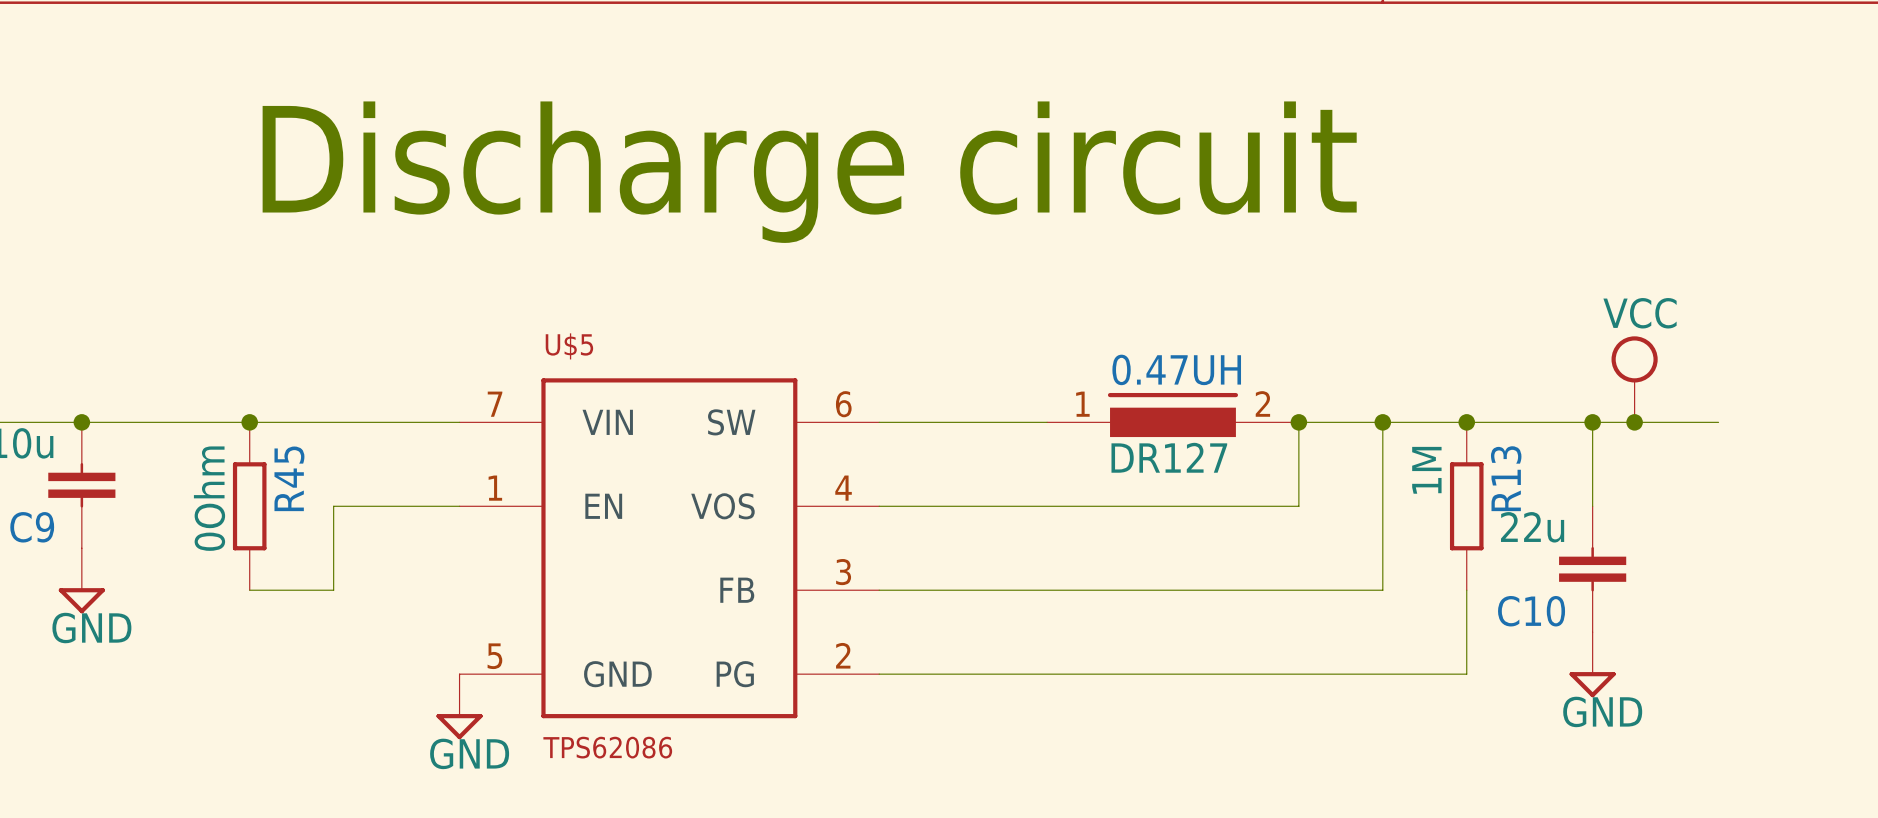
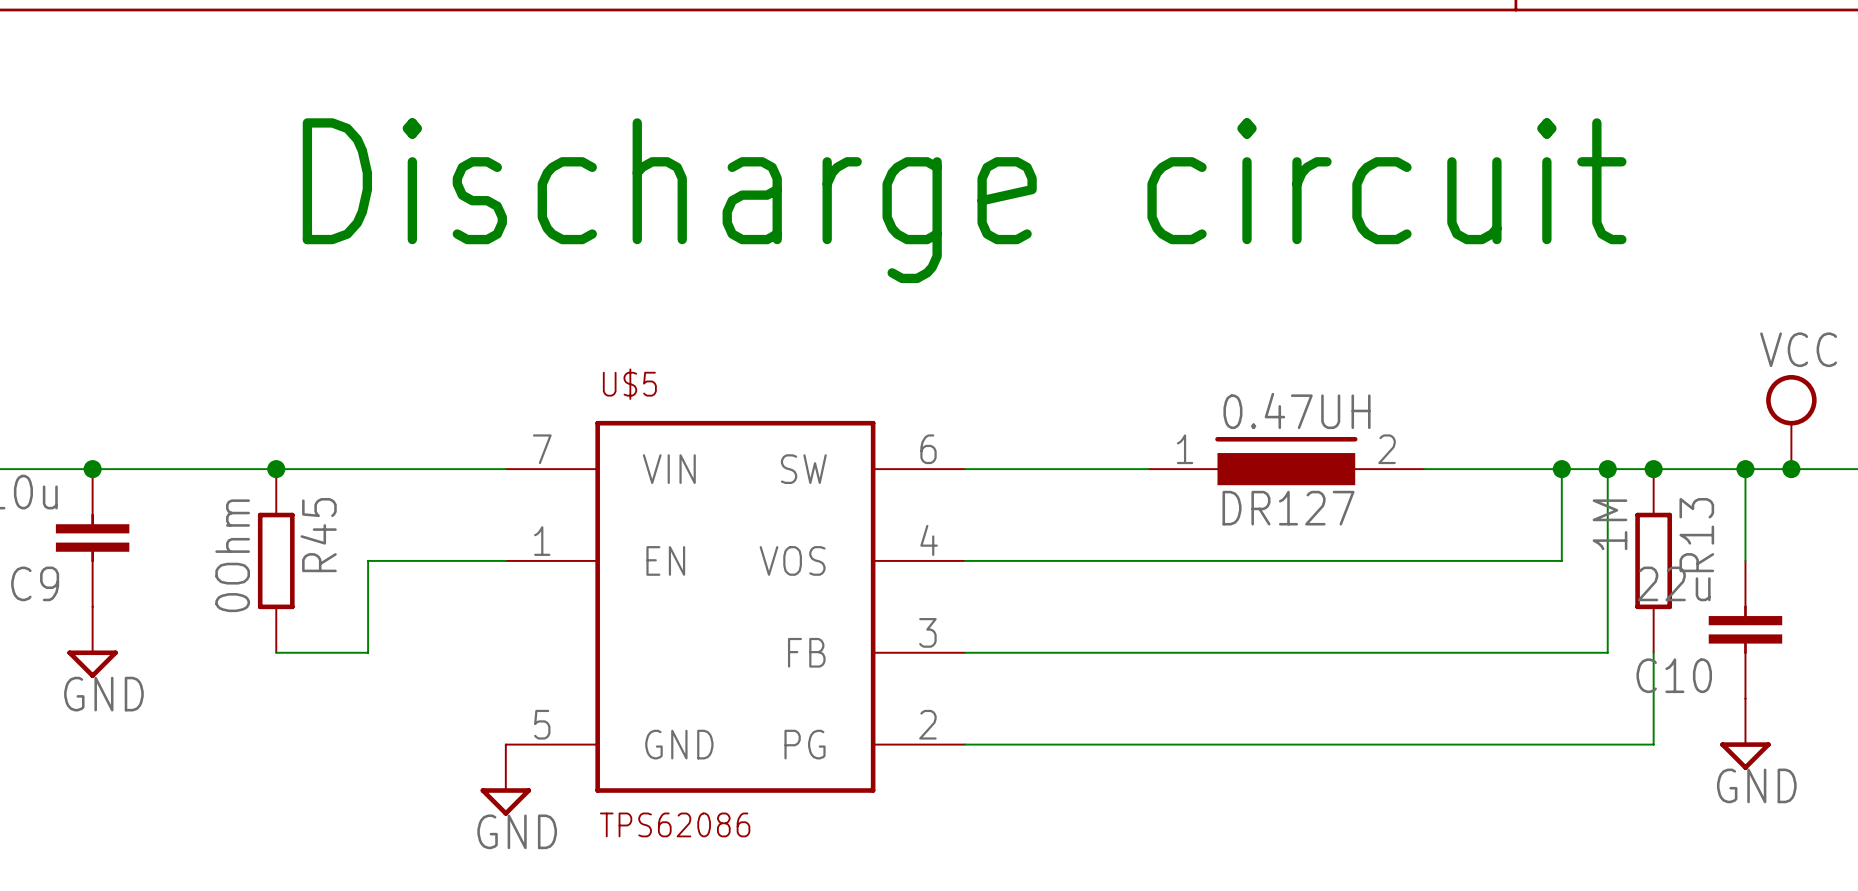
wire: (1298, 422) (1298, 506) -> (1561, 469) (1561, 560) (1424, 560)
junction: (1298, 422) -> none
wire: (1382, 422) (1382, 590) -> (1607, 469) (1607, 652) (1515, 652)
junction position: (1382, 422) -> (1561, 469)
junction: none -> (1653, 469)
R13 position: (1466, 506) -> (1653, 560)
wire: (1466, 590) (1466, 674) -> (1653, 652) (1653, 744) (1607, 744)

